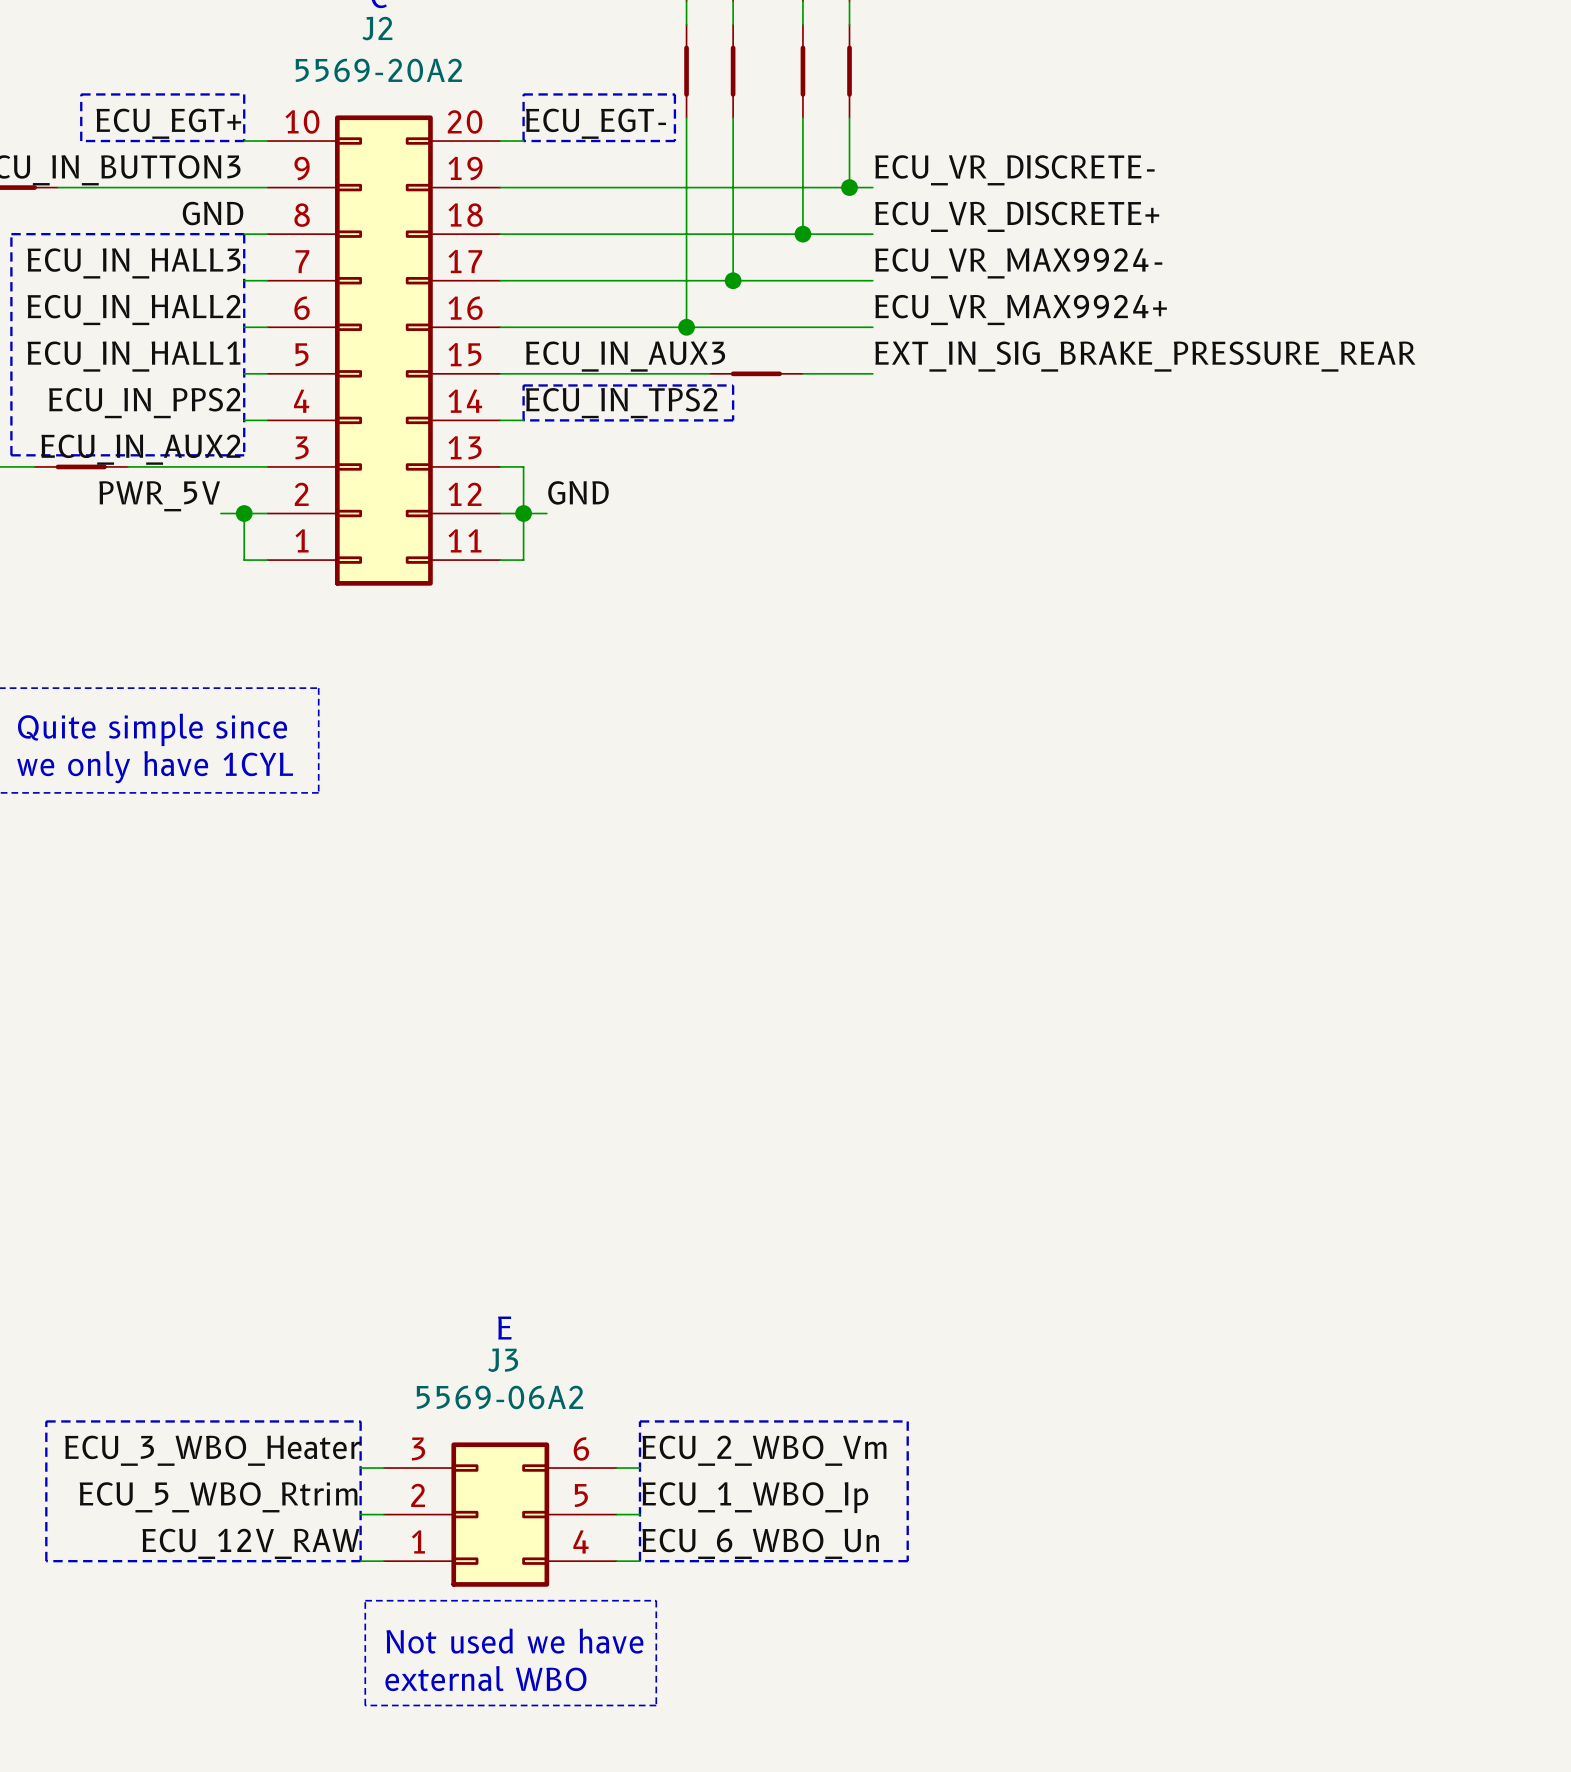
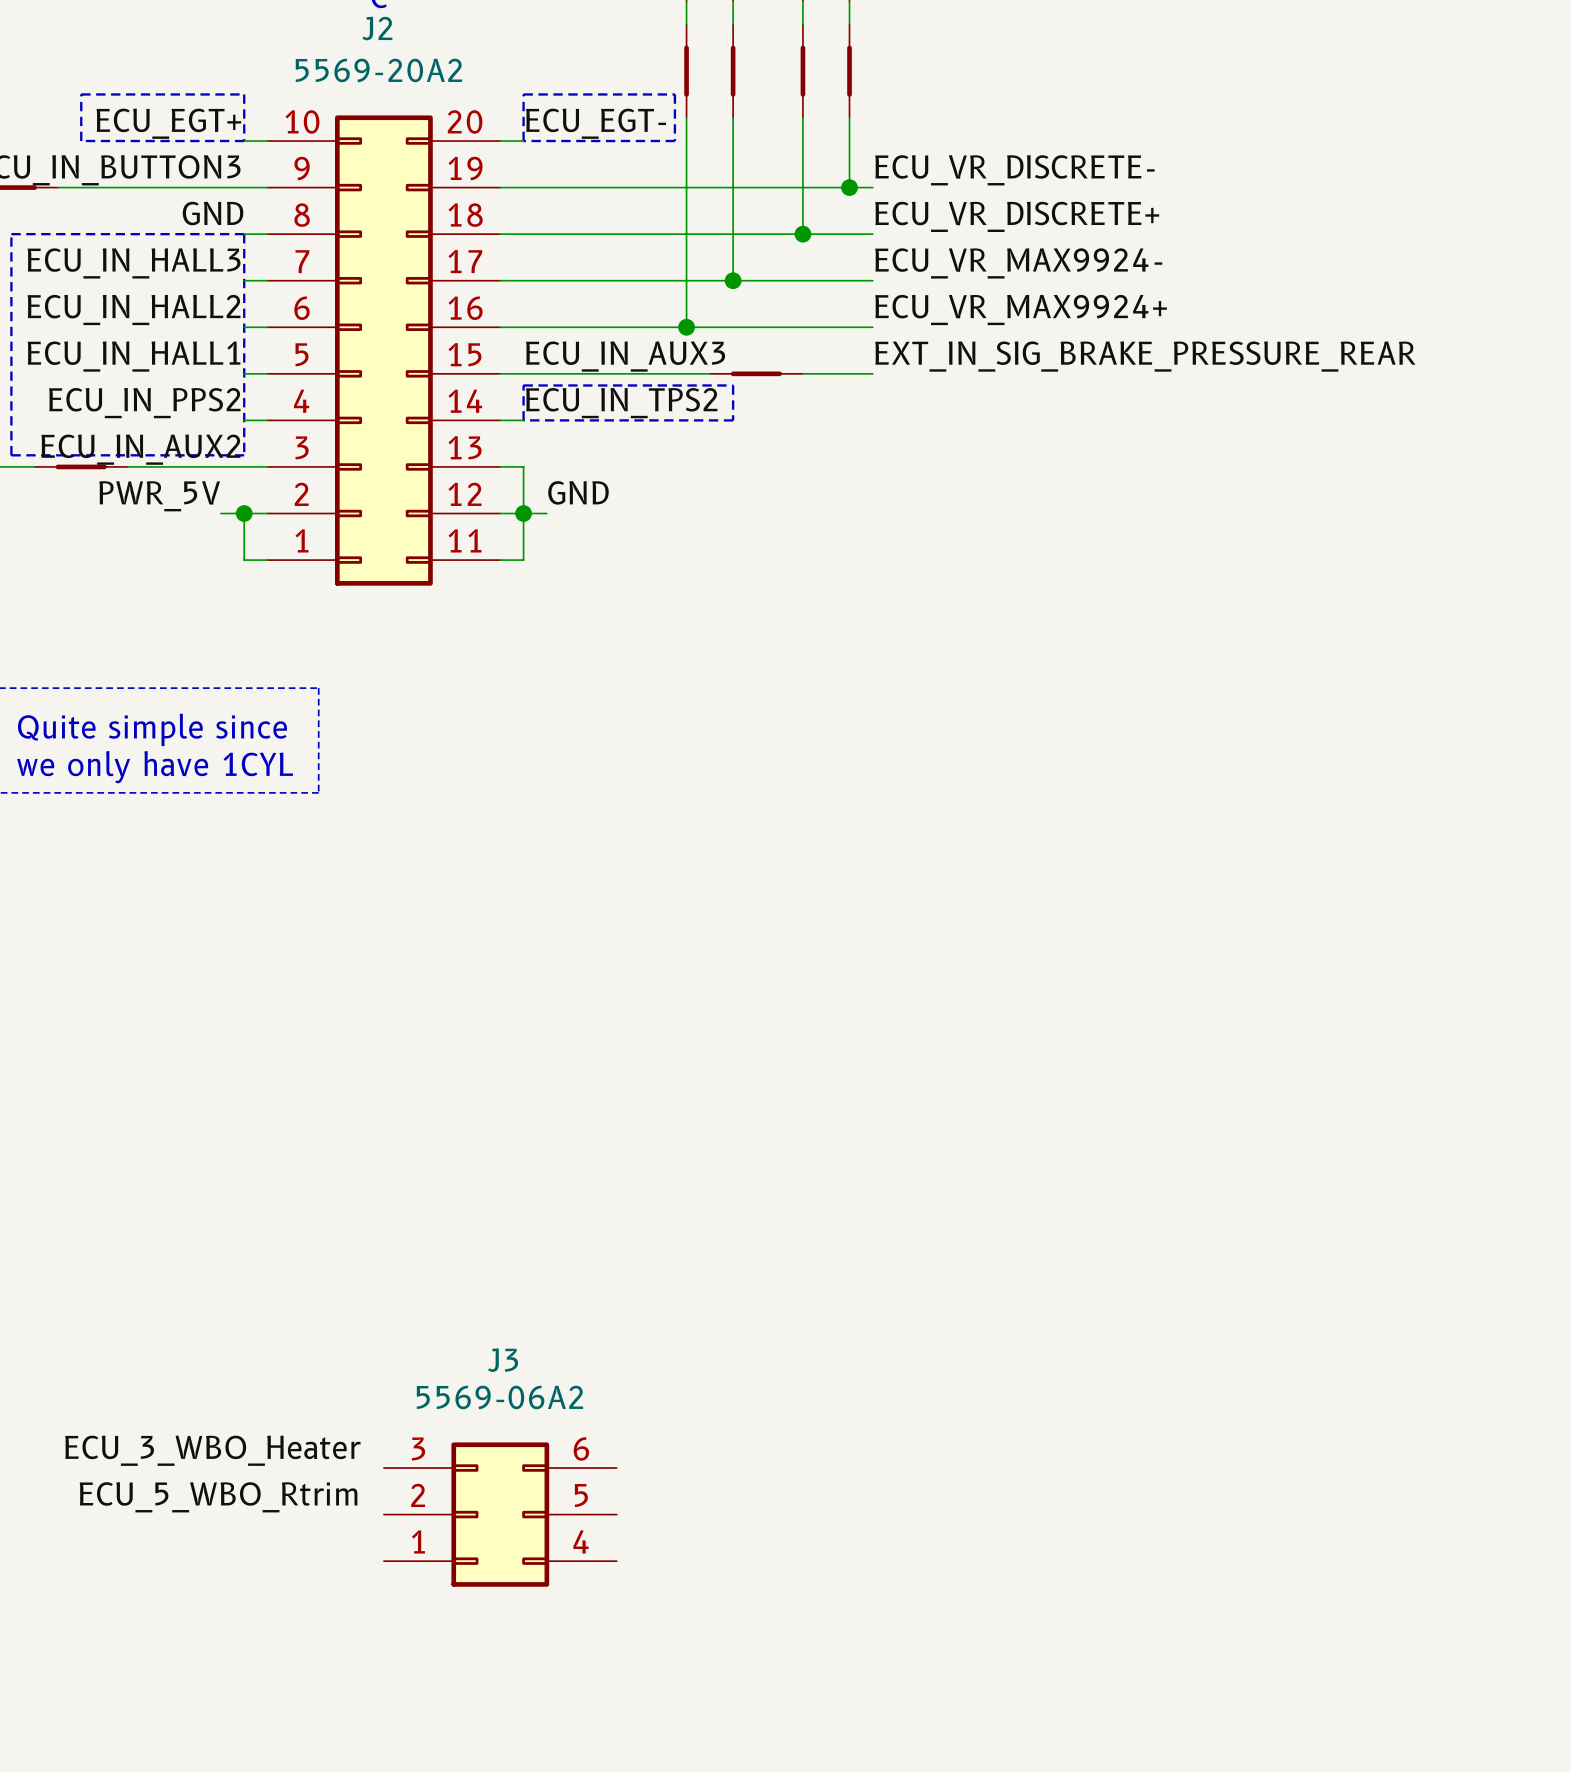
text: E (504, 1328) -> none
line: (46, 1421) (360, 1421) (360, 1561) (46, 1561) (46, 1421) -> none
line: (639, 1421) (907, 1421) (907, 1561) (639, 1561) (639, 1421) -> none
label: ECU_2_WBO_Vm (764, 1450) -> none
wire: (360, 1468) (383, 1468) -> none
wire: (616, 1468) (639, 1468) -> none
label: ECU_1_WBO_Ip (755, 1497) -> none
wire: (360, 1514) (383, 1514) -> none
wire: (616, 1514) (639, 1514) -> none
label: ECU_12V_RAW (250, 1543) -> none
label: ECU_6_WBO_Un (760, 1543) -> none
wire: (360, 1561) (383, 1561) -> none
wire: (616, 1561) (639, 1561) -> none
line: (365, 1600) (656, 1600) (656, 1705) (365, 1705) (365, 1600) -> none
text: Not used we have (514, 1641) -> none
text: external WBO (485, 1678) -> none

